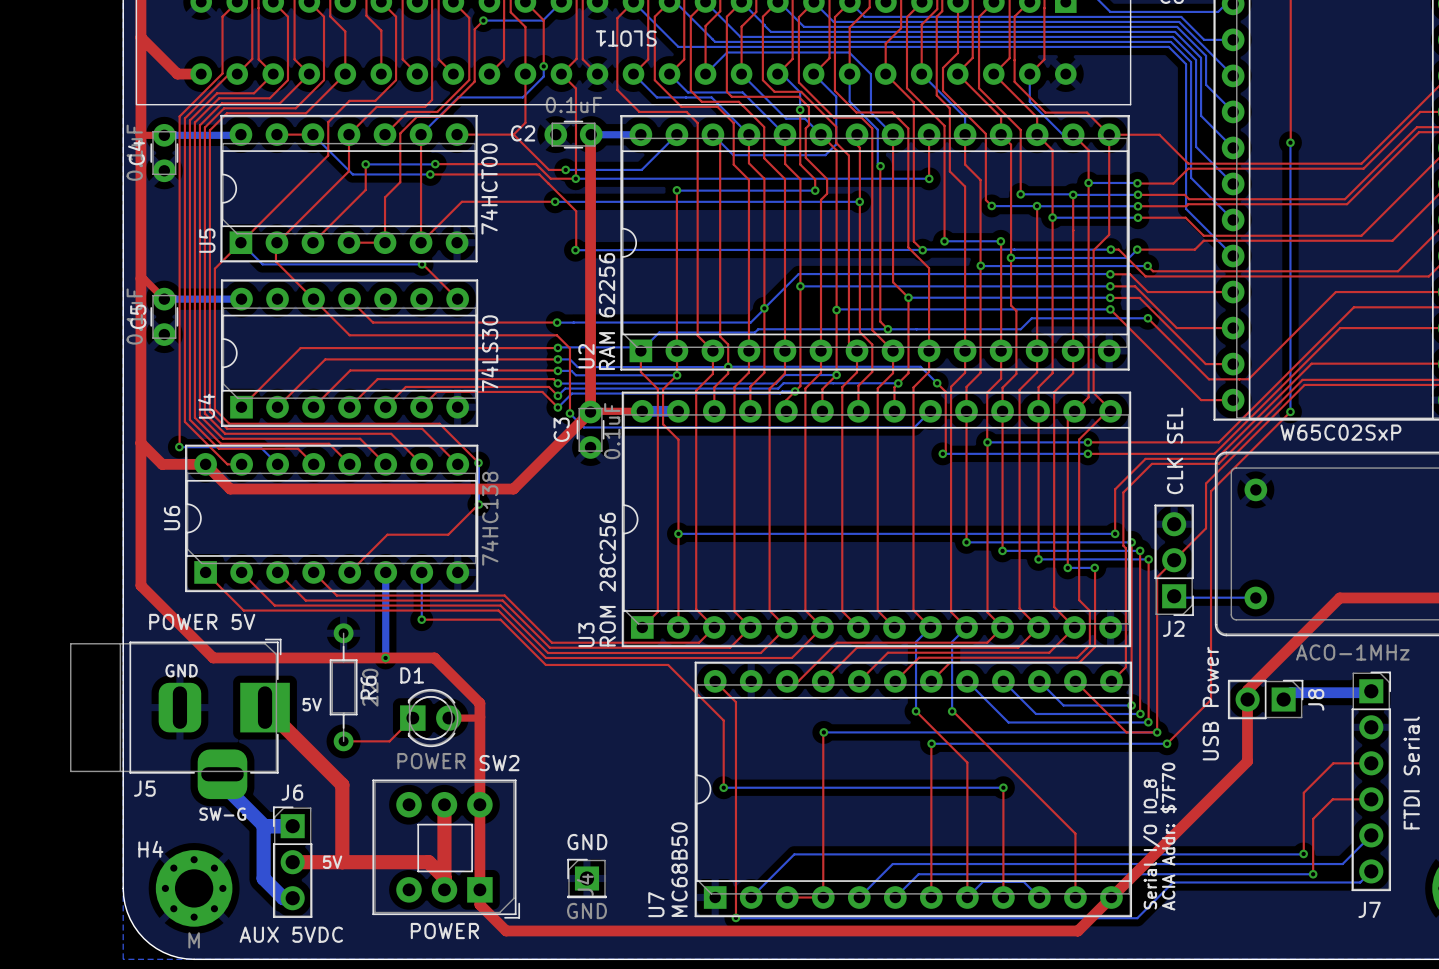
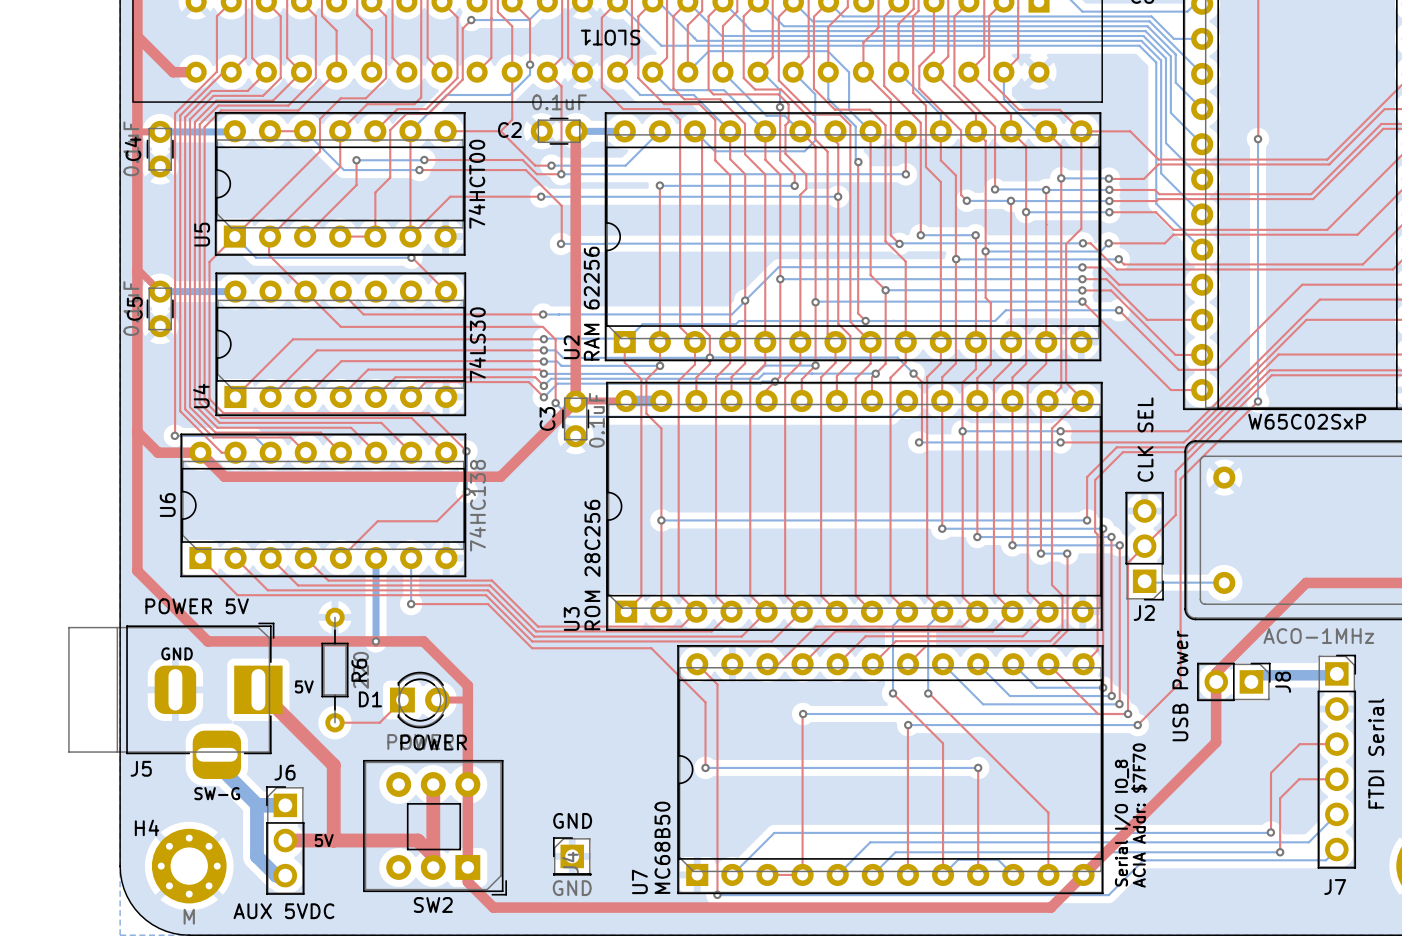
D1 name position: D1 (412, 675) -> D1 (370, 699)
SW2 name position: SW2 (499, 763) -> SW2 (433, 904)
SW2 value position: POWER (444, 931) -> POWER (433, 742)

